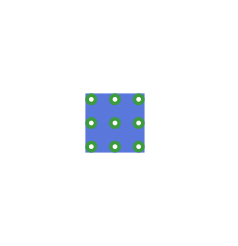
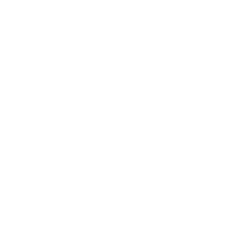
part: (114, 123) -> none

